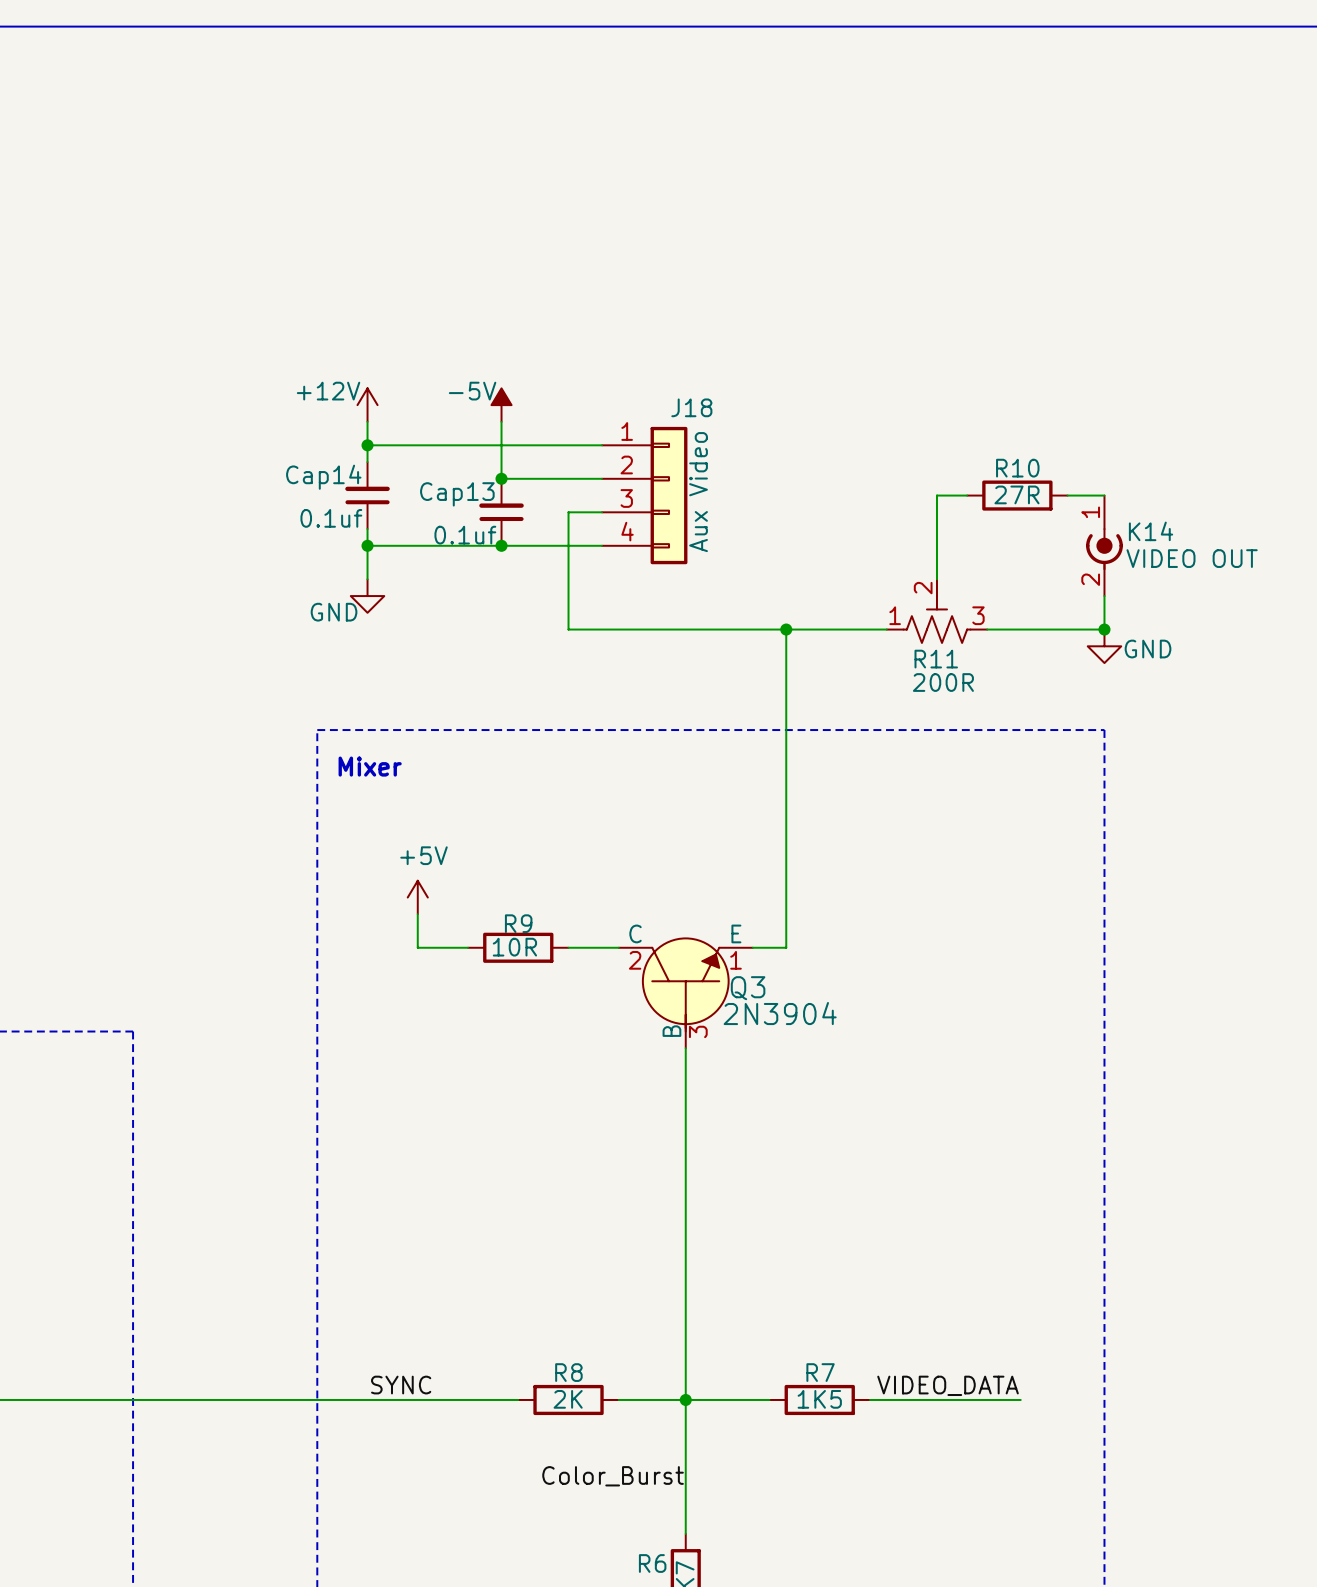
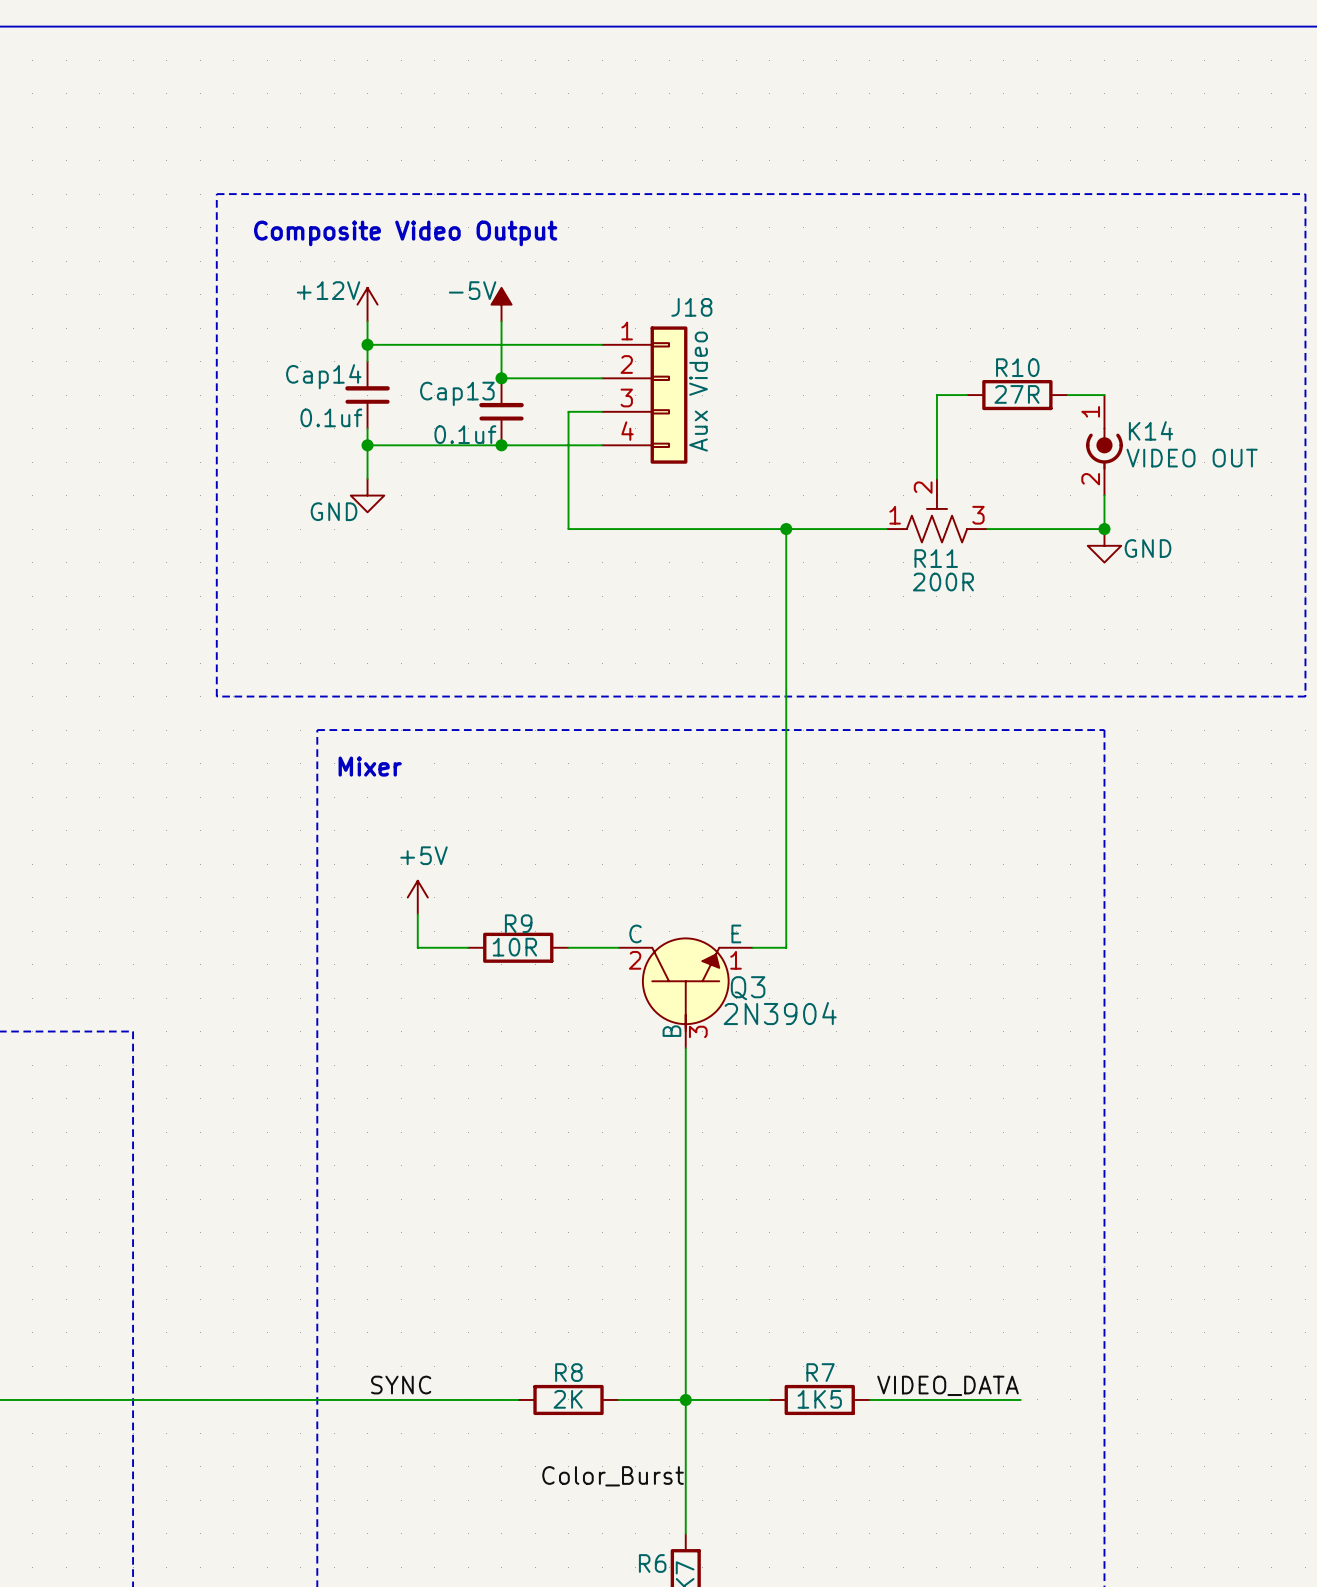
line: none -> (216, 194) (1305, 194) (1305, 696) (216, 696) (216, 194)
text: none -> Composite Video Output (405, 233)
wire: none -> (367, 321) (367, 361)
junction: none -> (367, 344)
junction: none -> (501, 378)
wire: none -> (1067, 395) (1104, 395)
power symbol position: +12V (367, 405) -> +12V (367, 304)
power symbol position: -5V (501, 405) -> -5V (501, 304)
wire: (501, 421) (501, 478) (602, 478) -> (501, 321) (501, 378) (602, 378)
junction position: (501, 478) -> (501, 445)
Cap14 position: (367, 495) -> (367, 395)
J18 position: (644, 495) -> (644, 395)
wire: (967, 495) (936, 495) (936, 579) -> (967, 395) (936, 395) (936, 478)
R10 position: (1017, 495) -> (1017, 395)
wire: (1067, 495) (1104, 495) -> (987, 529) (1104, 529) (1104, 495)
Cap13 position: (501, 512) -> (501, 411)
wire: (568, 512) (602, 512) -> (568, 512) (568, 411) (602, 411)
wire: (367, 529) (367, 579) -> none
wire: (568, 529) (568, 629) (886, 629) -> (568, 529) (886, 529)
wire: none -> (786, 529) (786, 629)
junction: none -> (786, 529)
junction: none -> (1104, 529)
wire: (367, 545) (602, 545) -> (367, 344) (602, 344)
junction: (367, 545) -> none
junction: (501, 545) -> none
K14 position: (1104, 545) -> (1104, 445)
power symbol position: GND (367, 596) -> GND (367, 495)
wire: (1104, 596) (1104, 629) (987, 629) -> none
R11 position: (936, 611) -> (936, 510)
junction: (786, 629) -> none
junction: (1104, 629) -> none
power symbol position: GND (1104, 646) -> GND (1104, 545)

